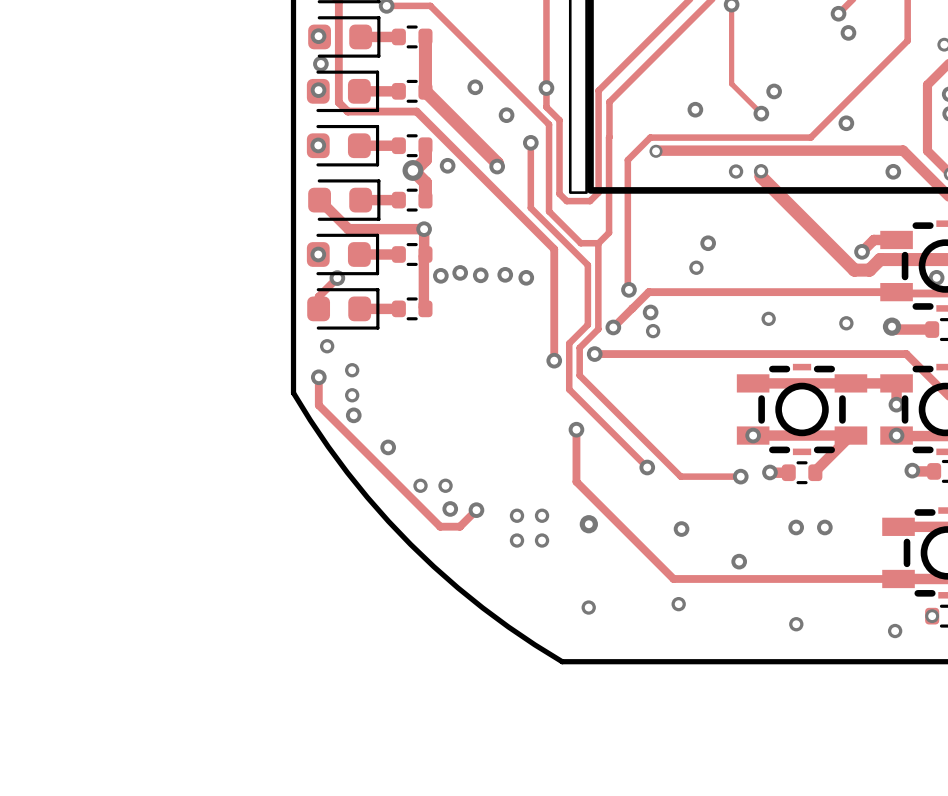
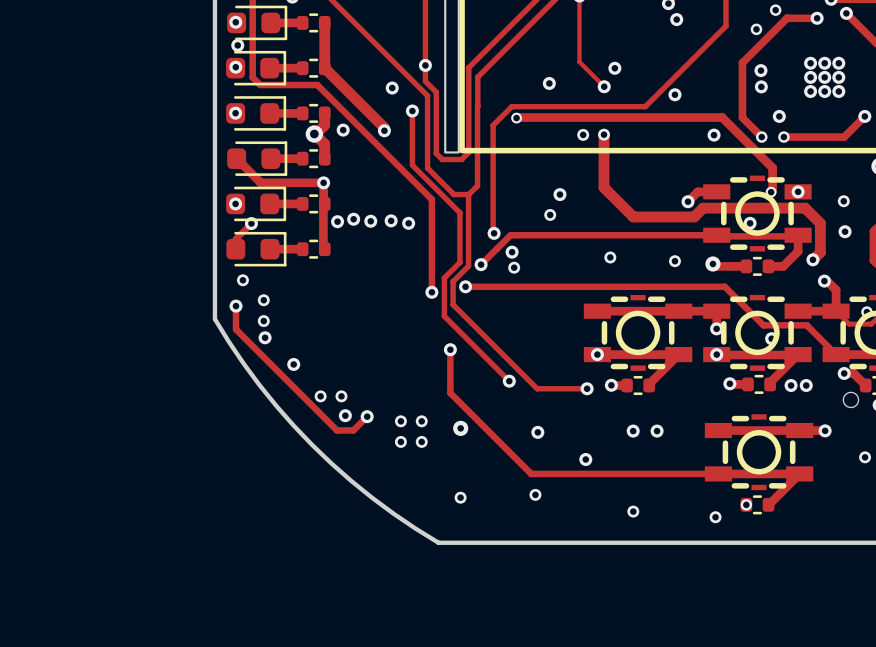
via: (475, 87) -> none
track: (761, 176) (854, 270) -> (604, 139) (604, 187) (633, 216) (681, 216)

